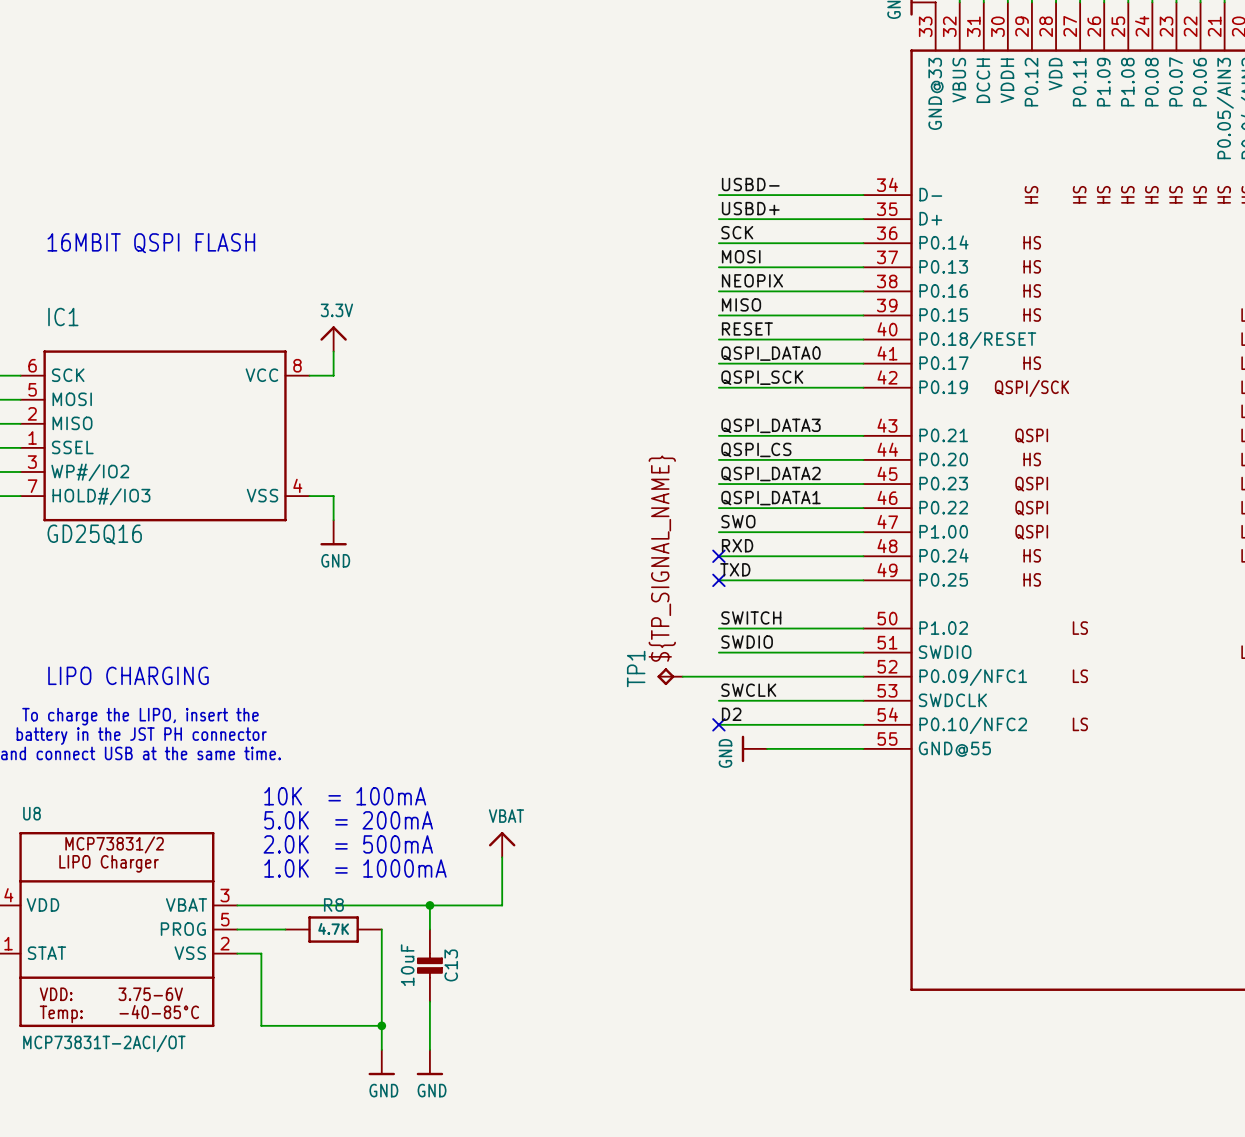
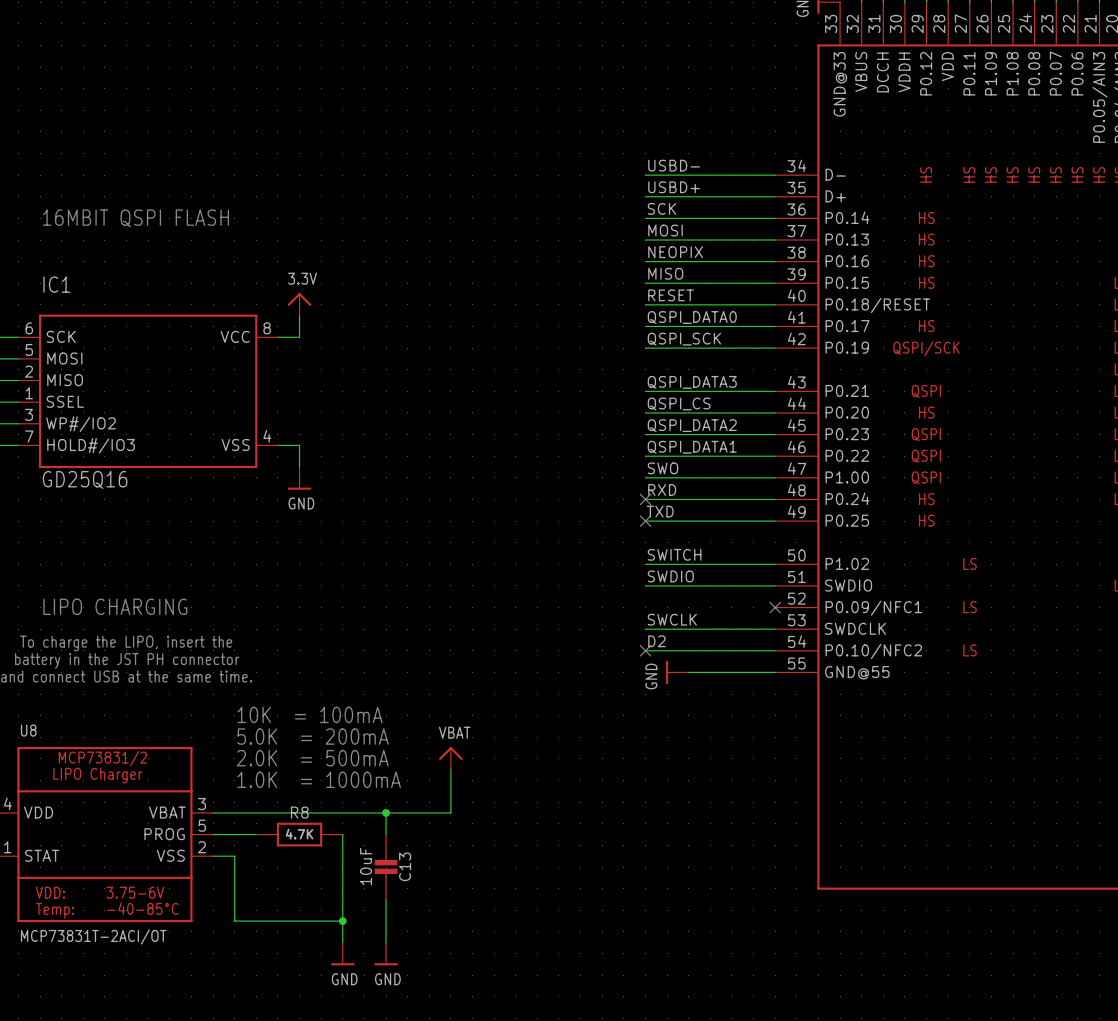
TP1: (670, 676) -> none
wire: (682, 676) (863, 676) -> none
no-connect mark: none -> (775, 607)

